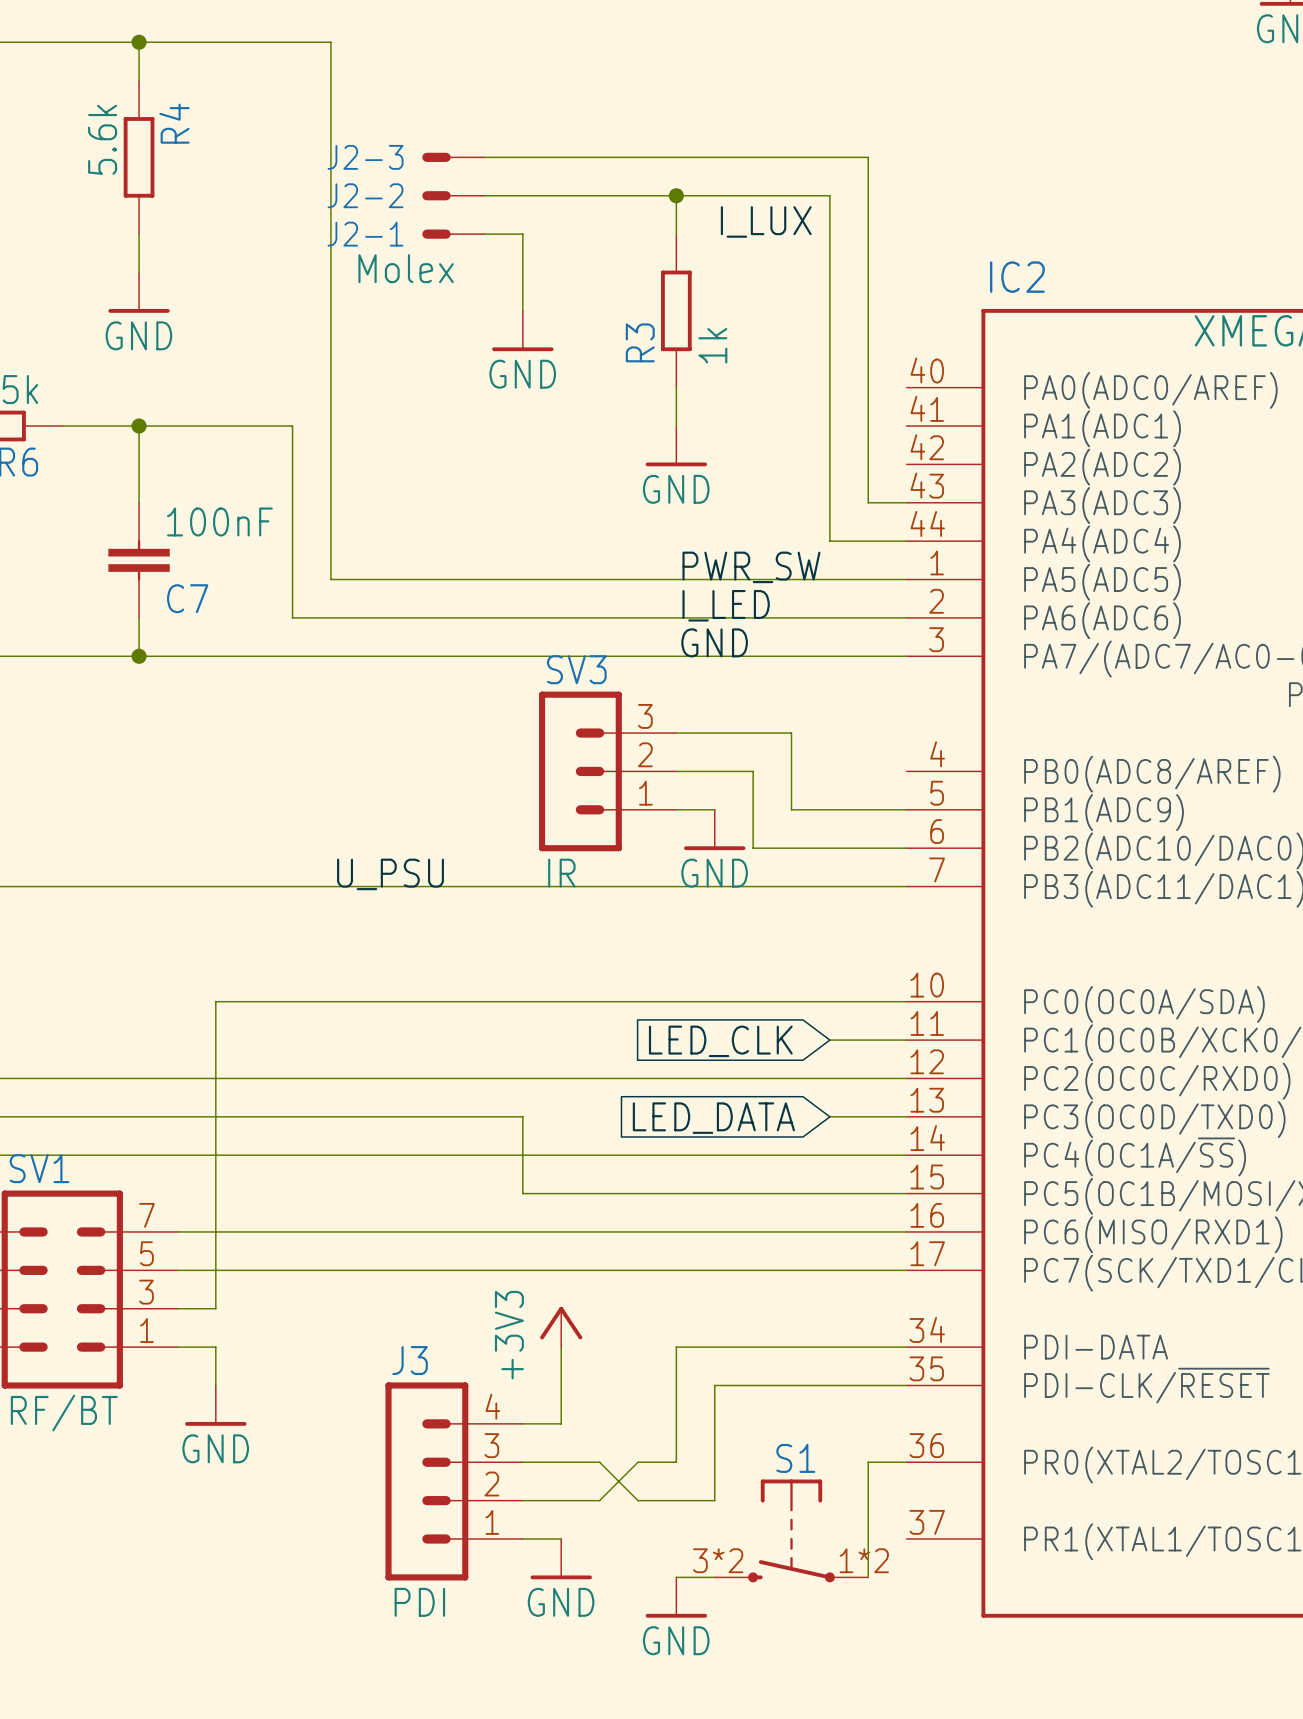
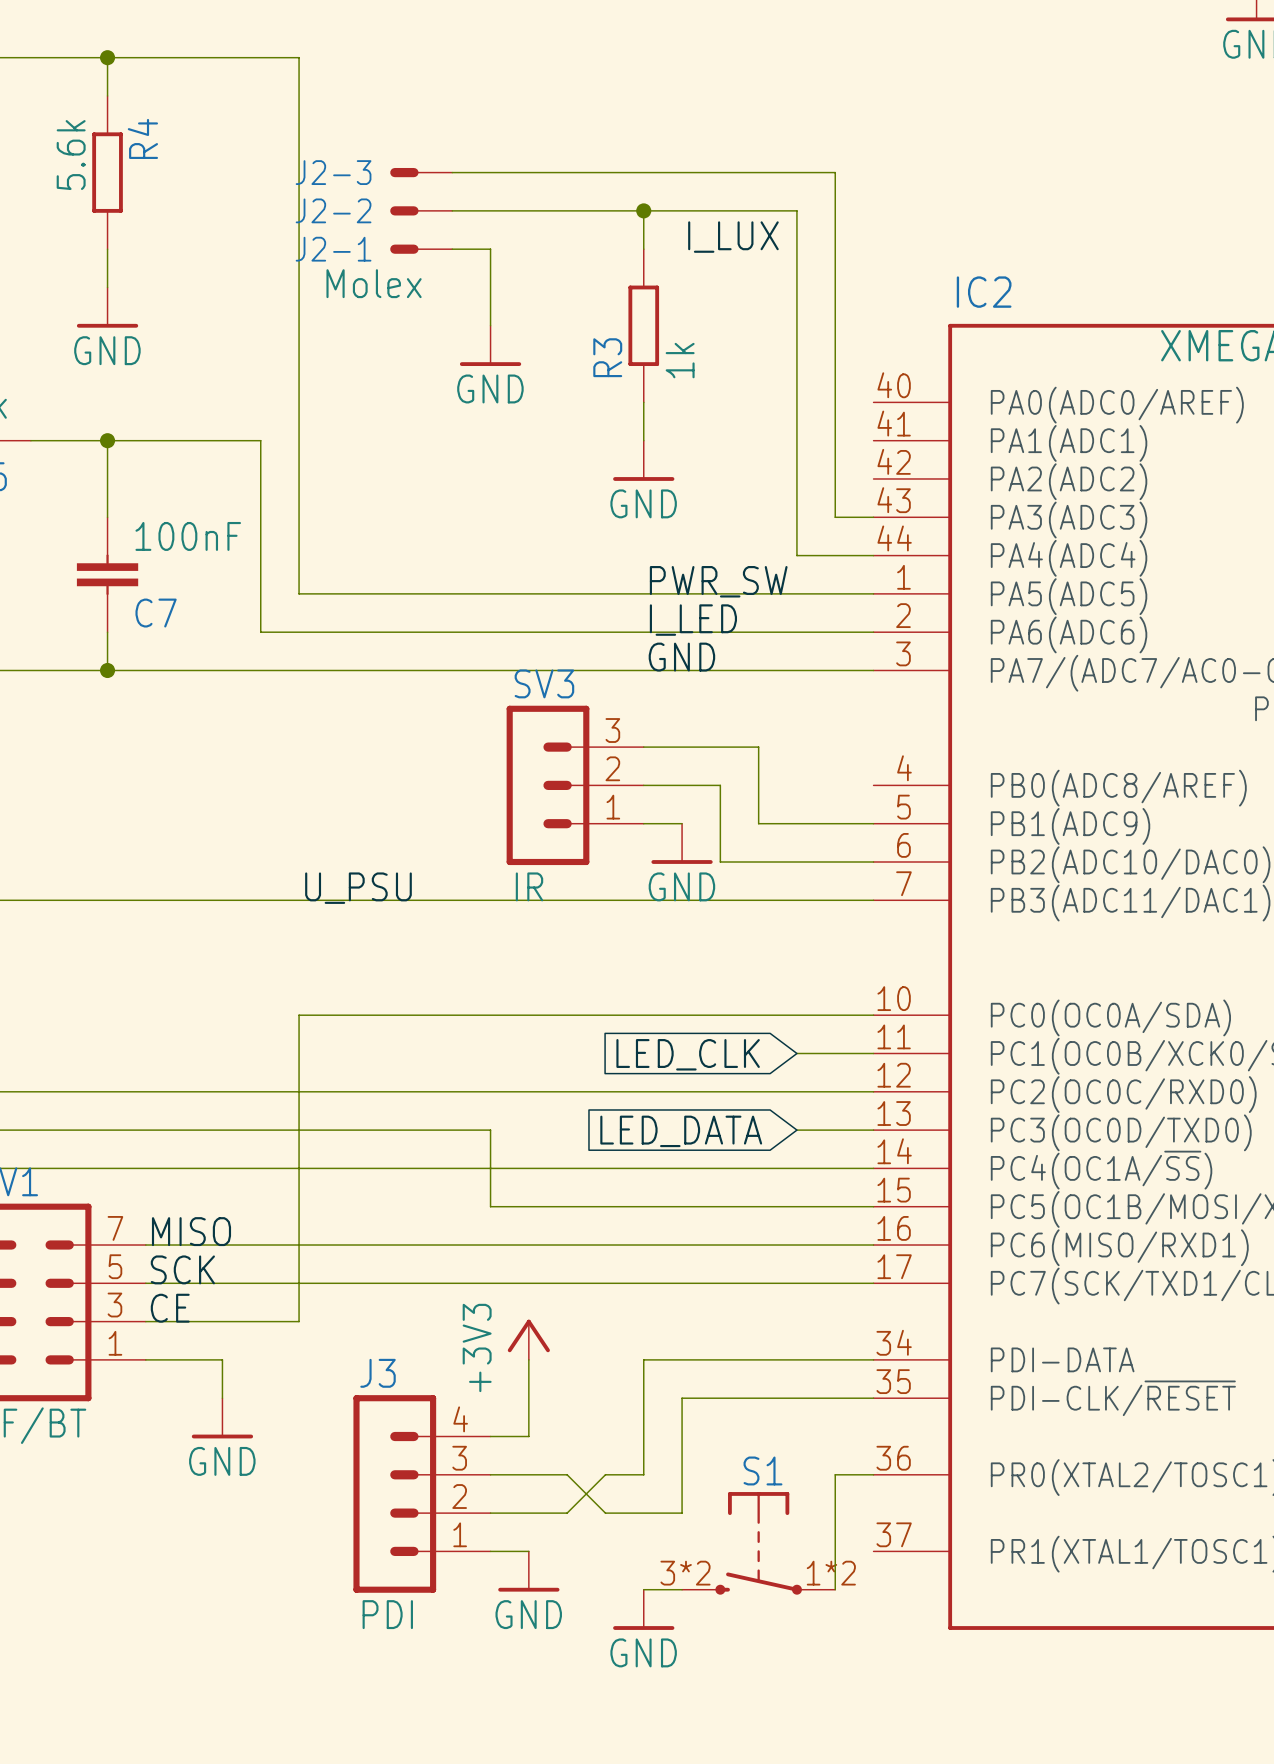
wire: (330, 1001) (215, 1001) (215, 1308) -> (299, 1015) (299, 1321) (184, 1321)
label: none -> MISO (191, 1231)
label: none -> SCK (182, 1269)
label: none -> CE (170, 1308)
wire: (215, 1347) (215, 1385) -> (184, 1359) (222, 1359) (222, 1398)
power symbol position: GND (215, 1405) -> GND (222, 1418)

